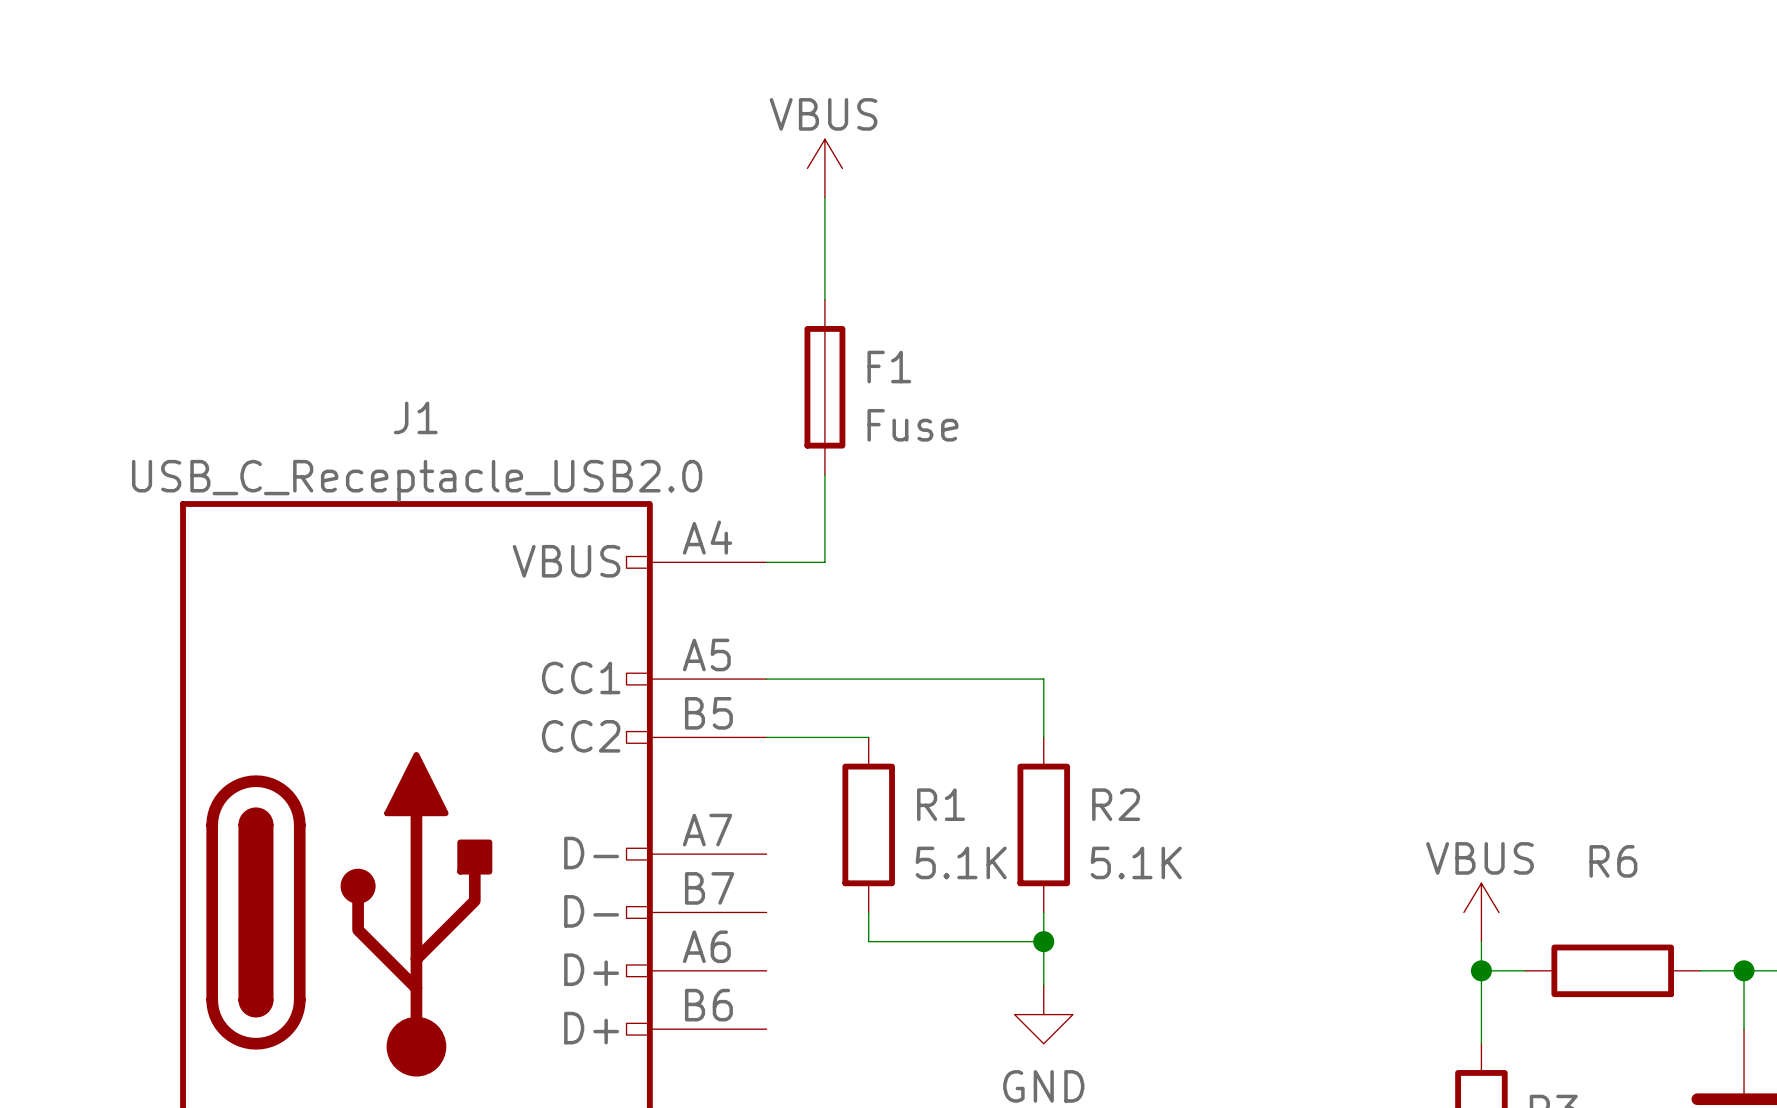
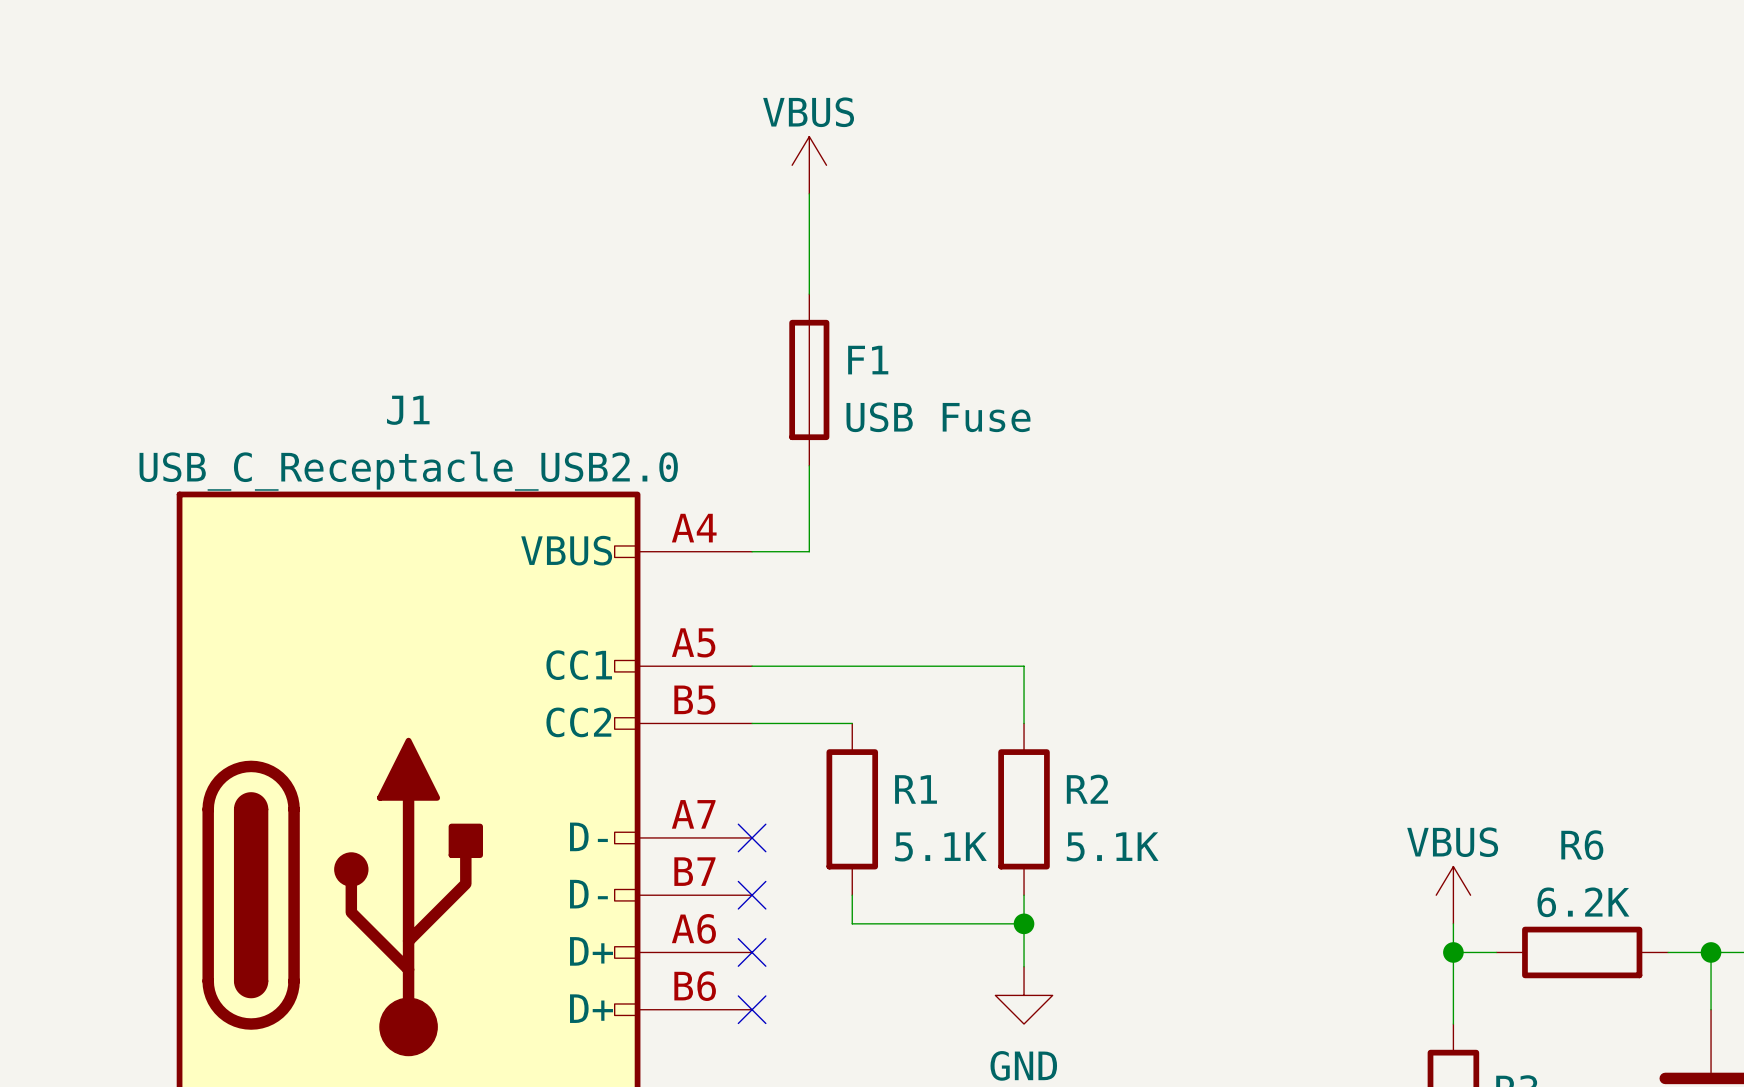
F1 value: Fuse (912, 425) -> USB Fuse (938, 417)
no-connect mark: none -> (752, 837)
no-connect mark: none -> (752, 895)
R6 value: none -> 6.2K (1583, 902)
no-connect mark: none -> (752, 952)
no-connect mark: none -> (752, 1009)

